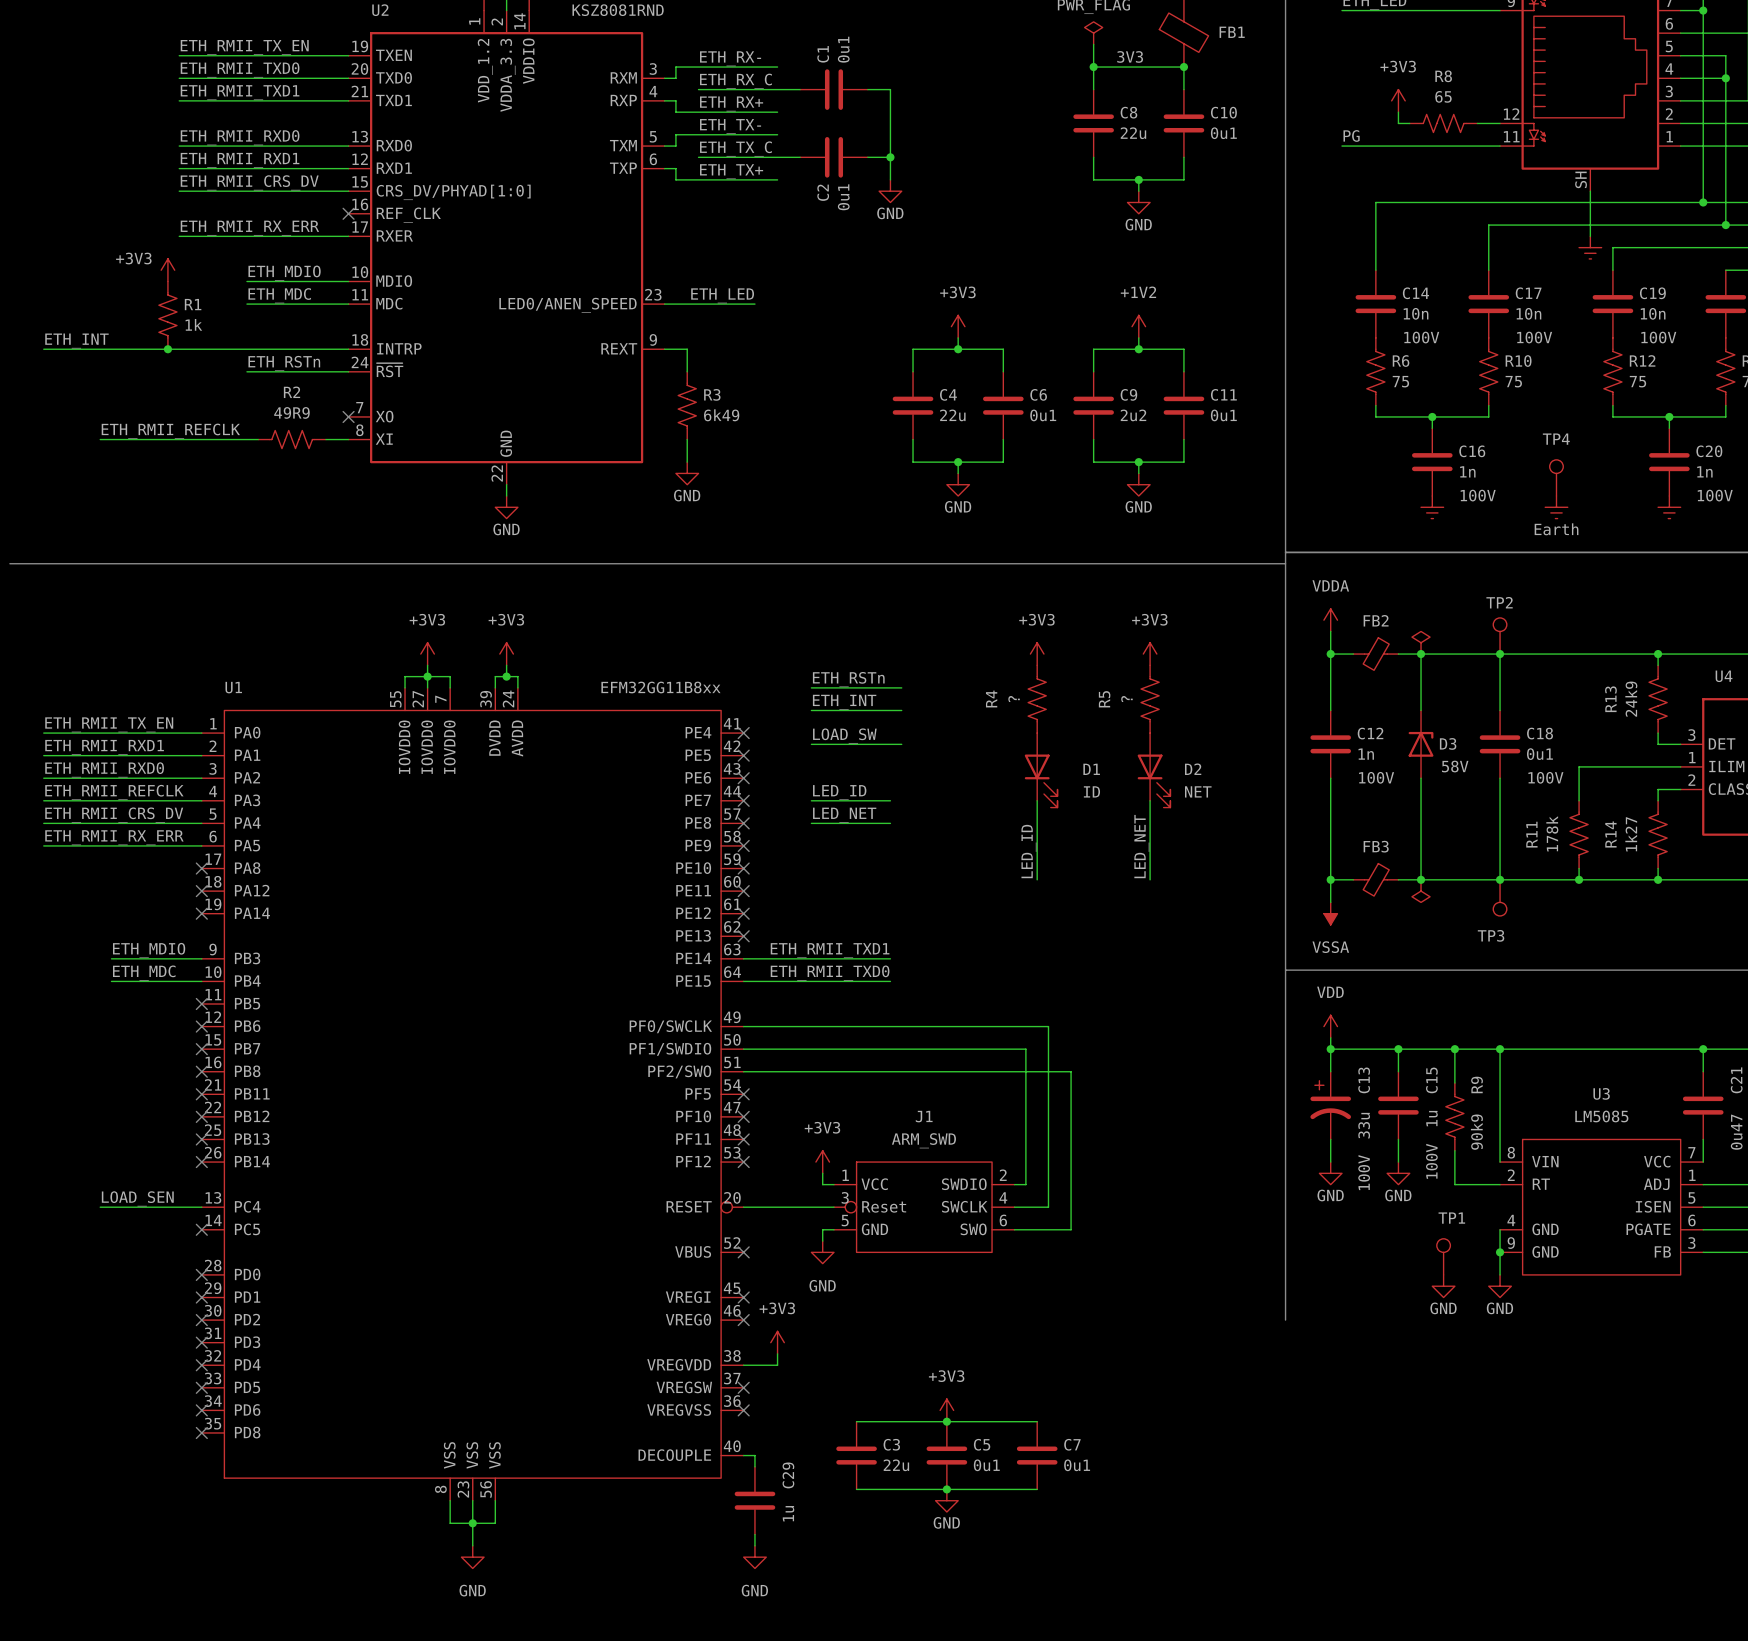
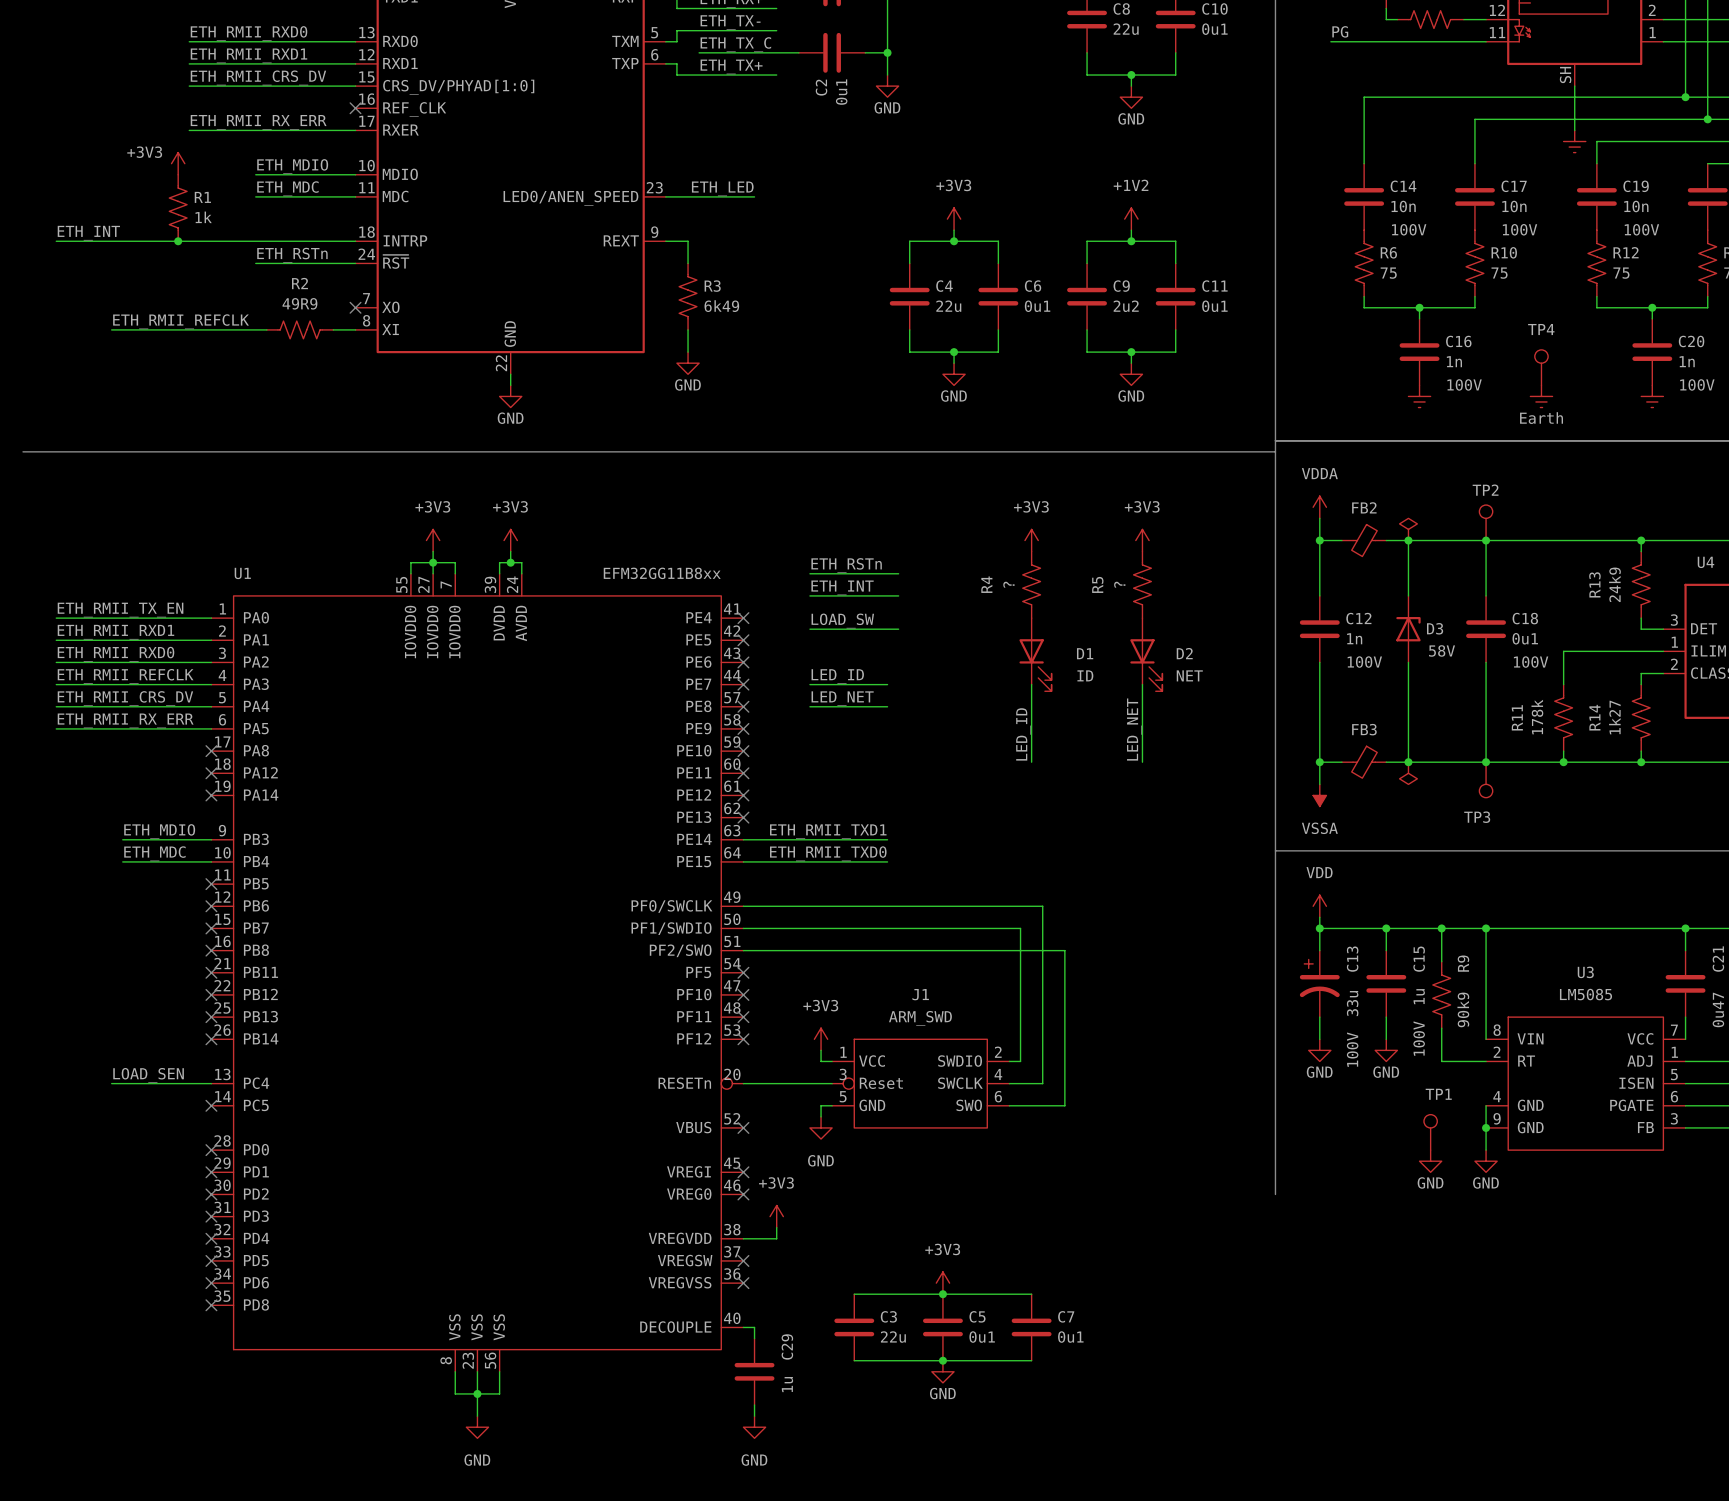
U1 pin name: RESET (689, 1206) -> RESETn (684, 1083)

